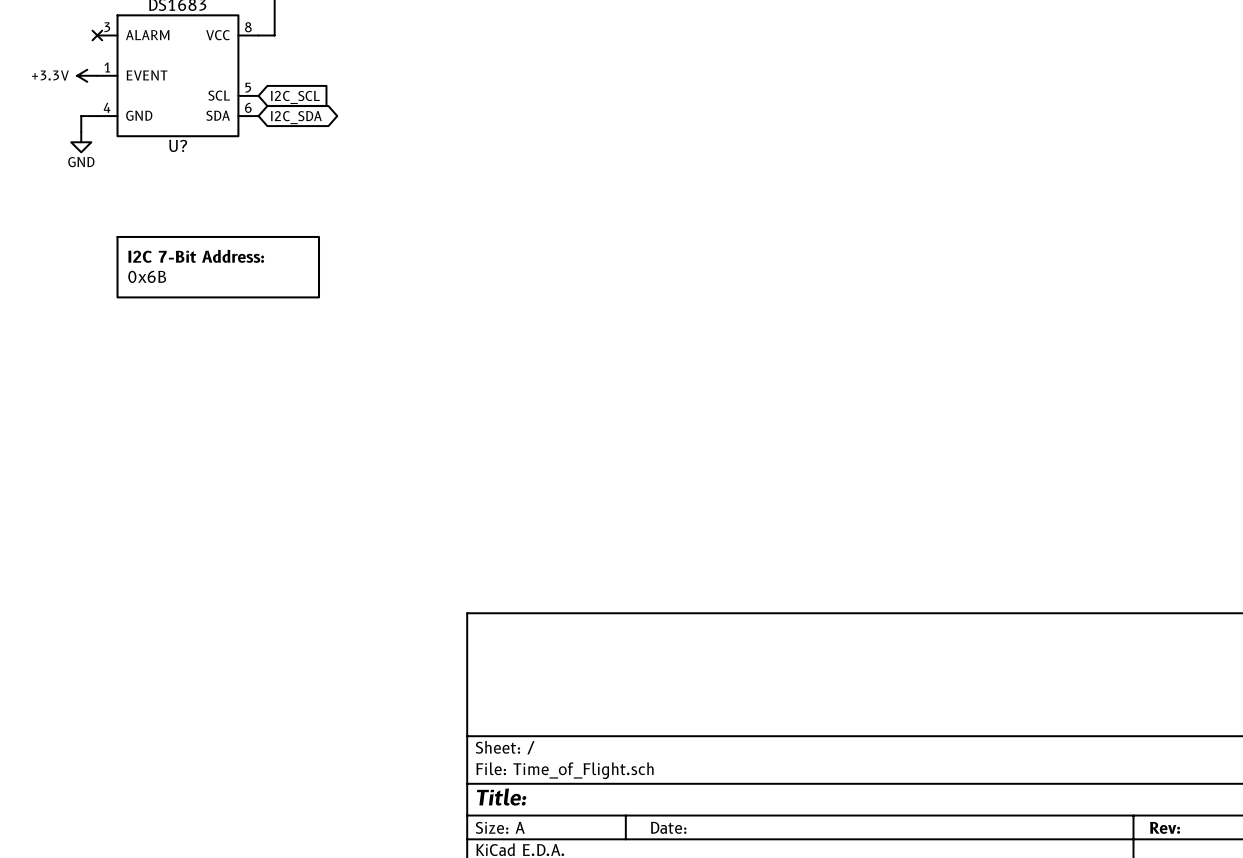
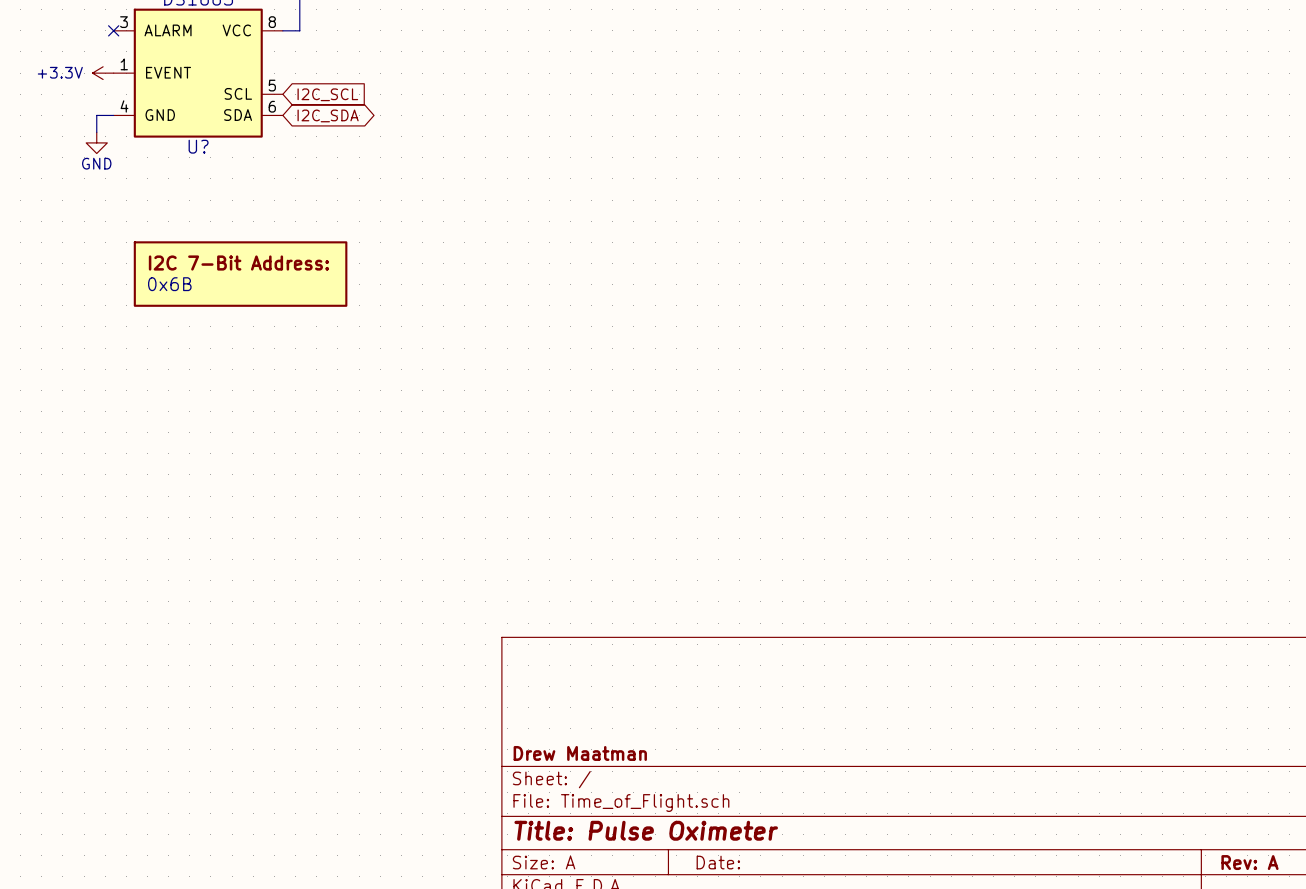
title block: none -> Drew Maatman (580, 753)
title block: Title: (501, 797) -> Title: Pulse Oximeter (646, 830)
title block: Rev: (1165, 827) -> Rev: A (1249, 862)

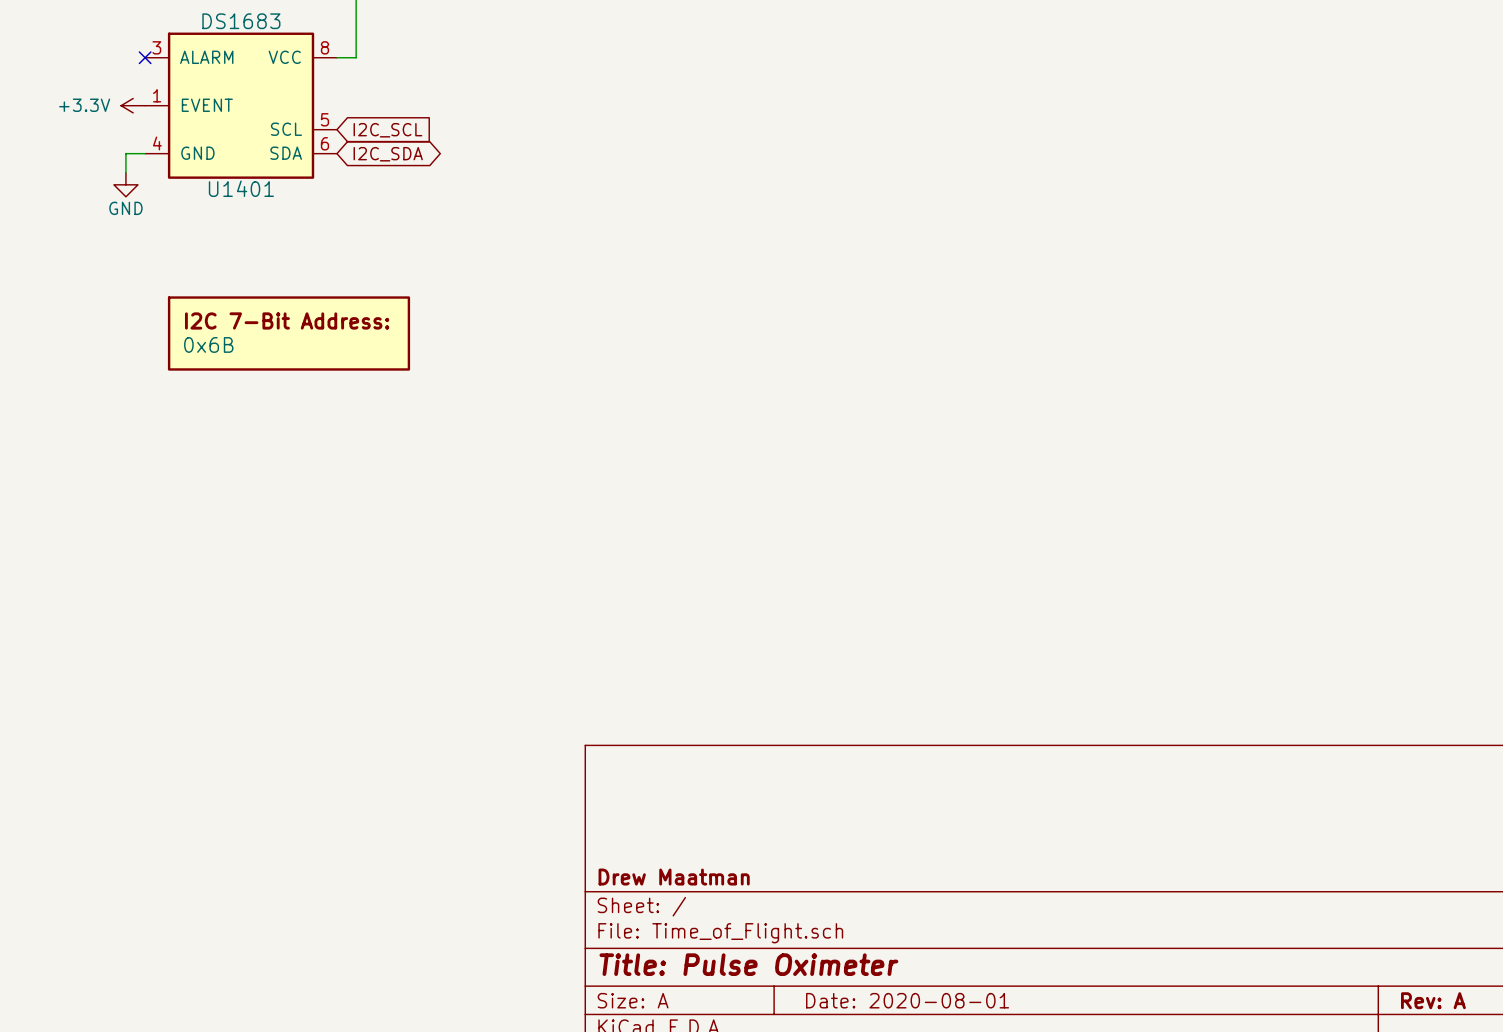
U? name: U? (198, 146) -> U1401 (241, 188)
title block: Date: (718, 862) -> Date: 2020-08-01 (907, 1000)

